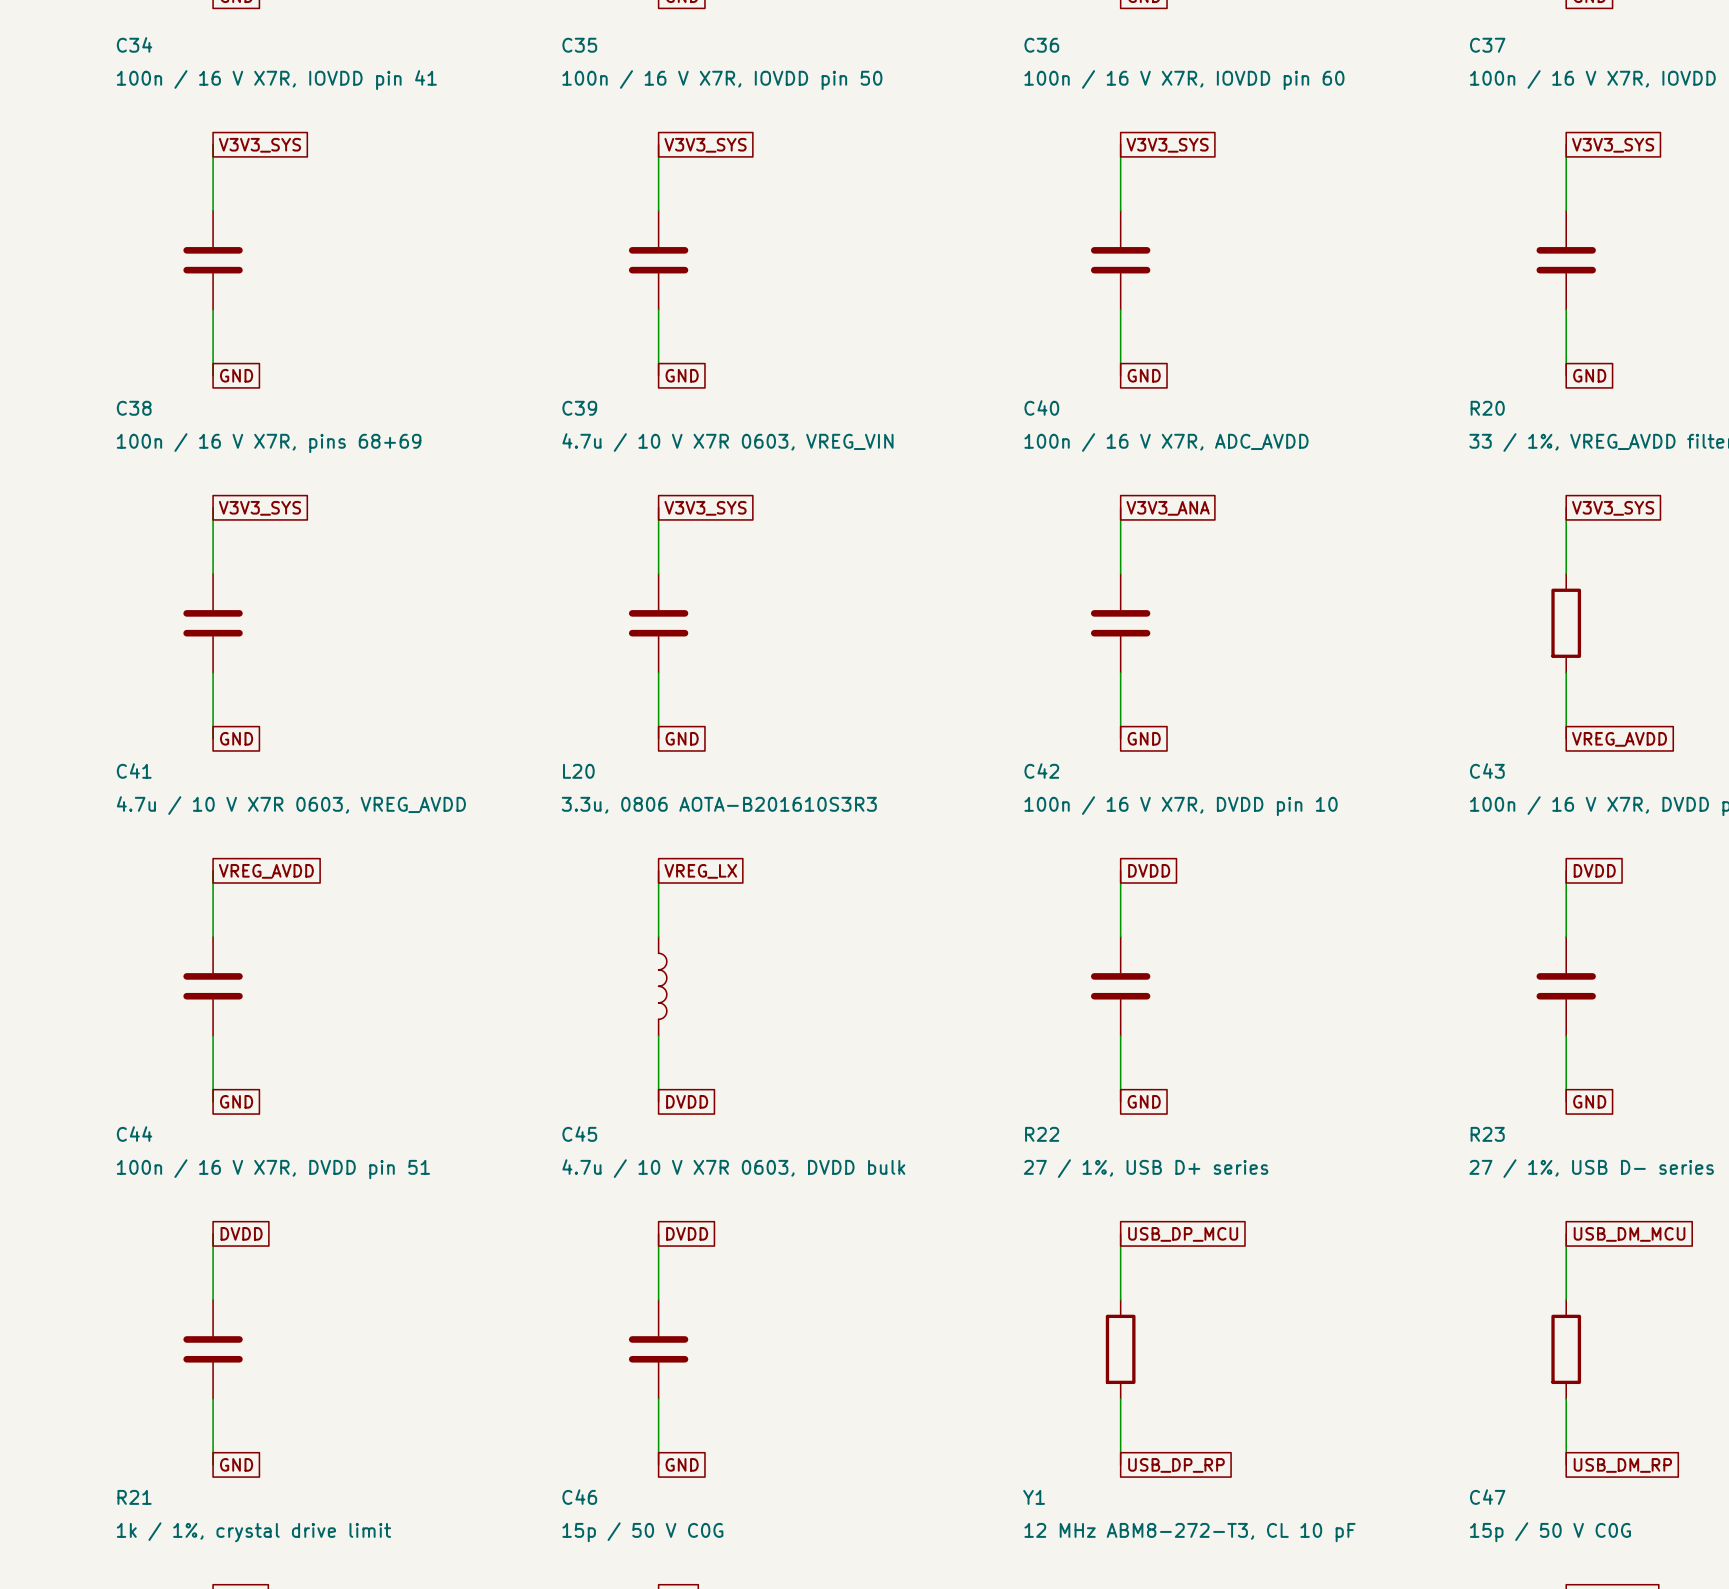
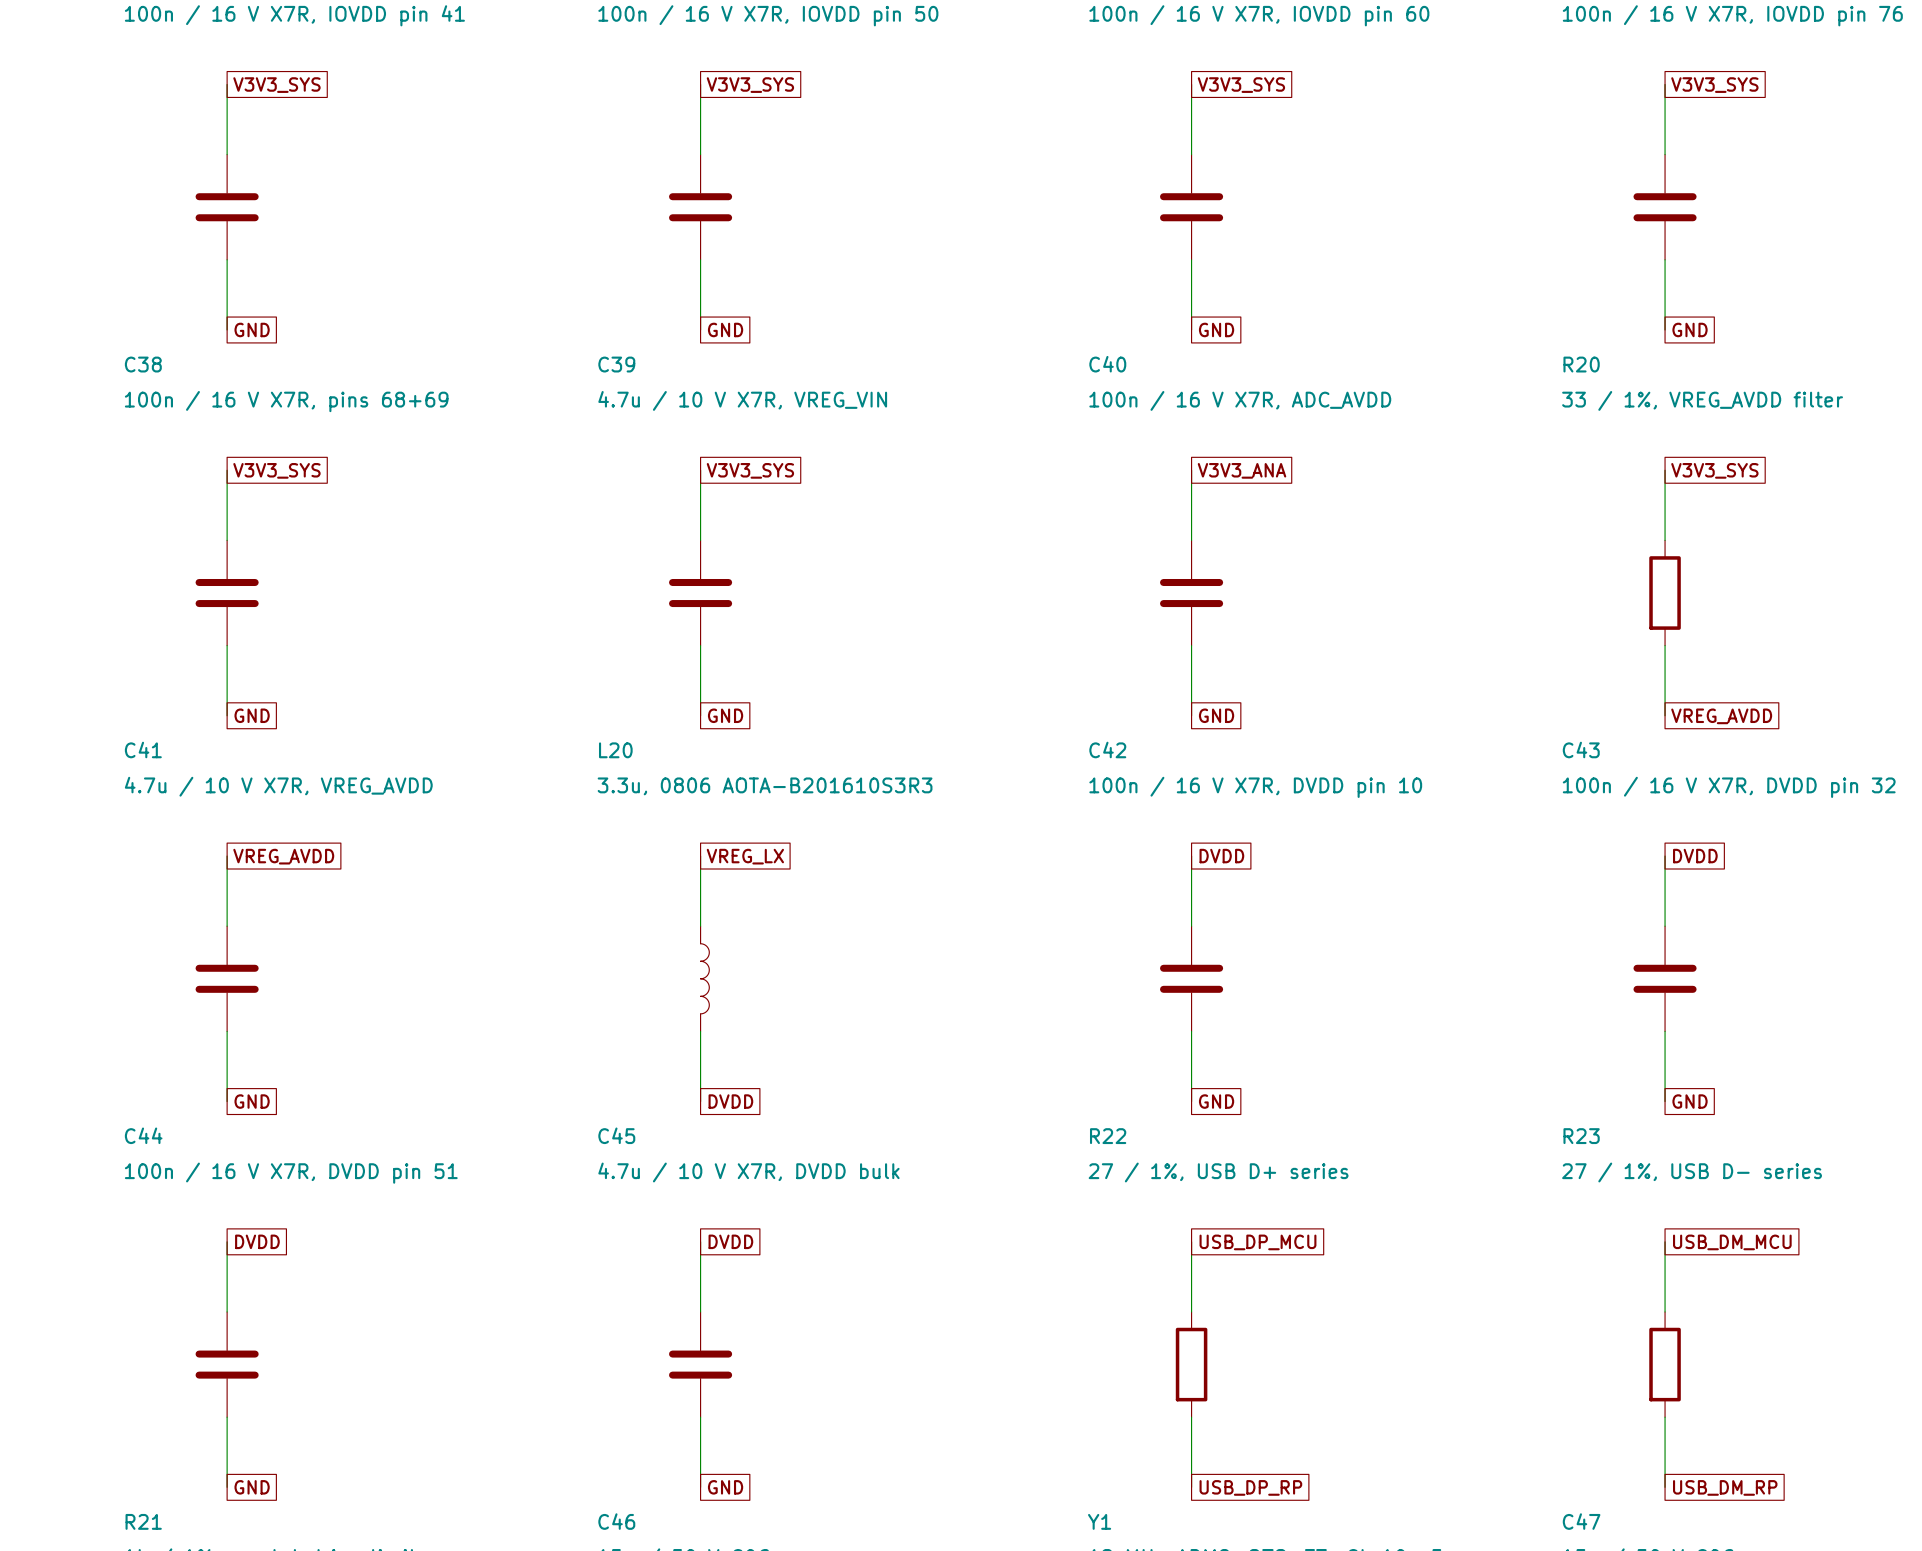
C39 value: 4.7u / 10 V X7R 0603, VREG_VIN (727, 442) -> 4.7u / 10 V X7R, VREG_VIN (742, 400)
C41 value: 4.7u / 10 V X7R 0603, VREG_AVDD (291, 805) -> 4.7u / 10 V X7R, VREG_AVDD (278, 786)
C45 value: 4.7u / 10 V X7R 0603, DVDD bulk (733, 1168) -> 4.7u / 10 V X7R, DVDD bulk (748, 1172)

